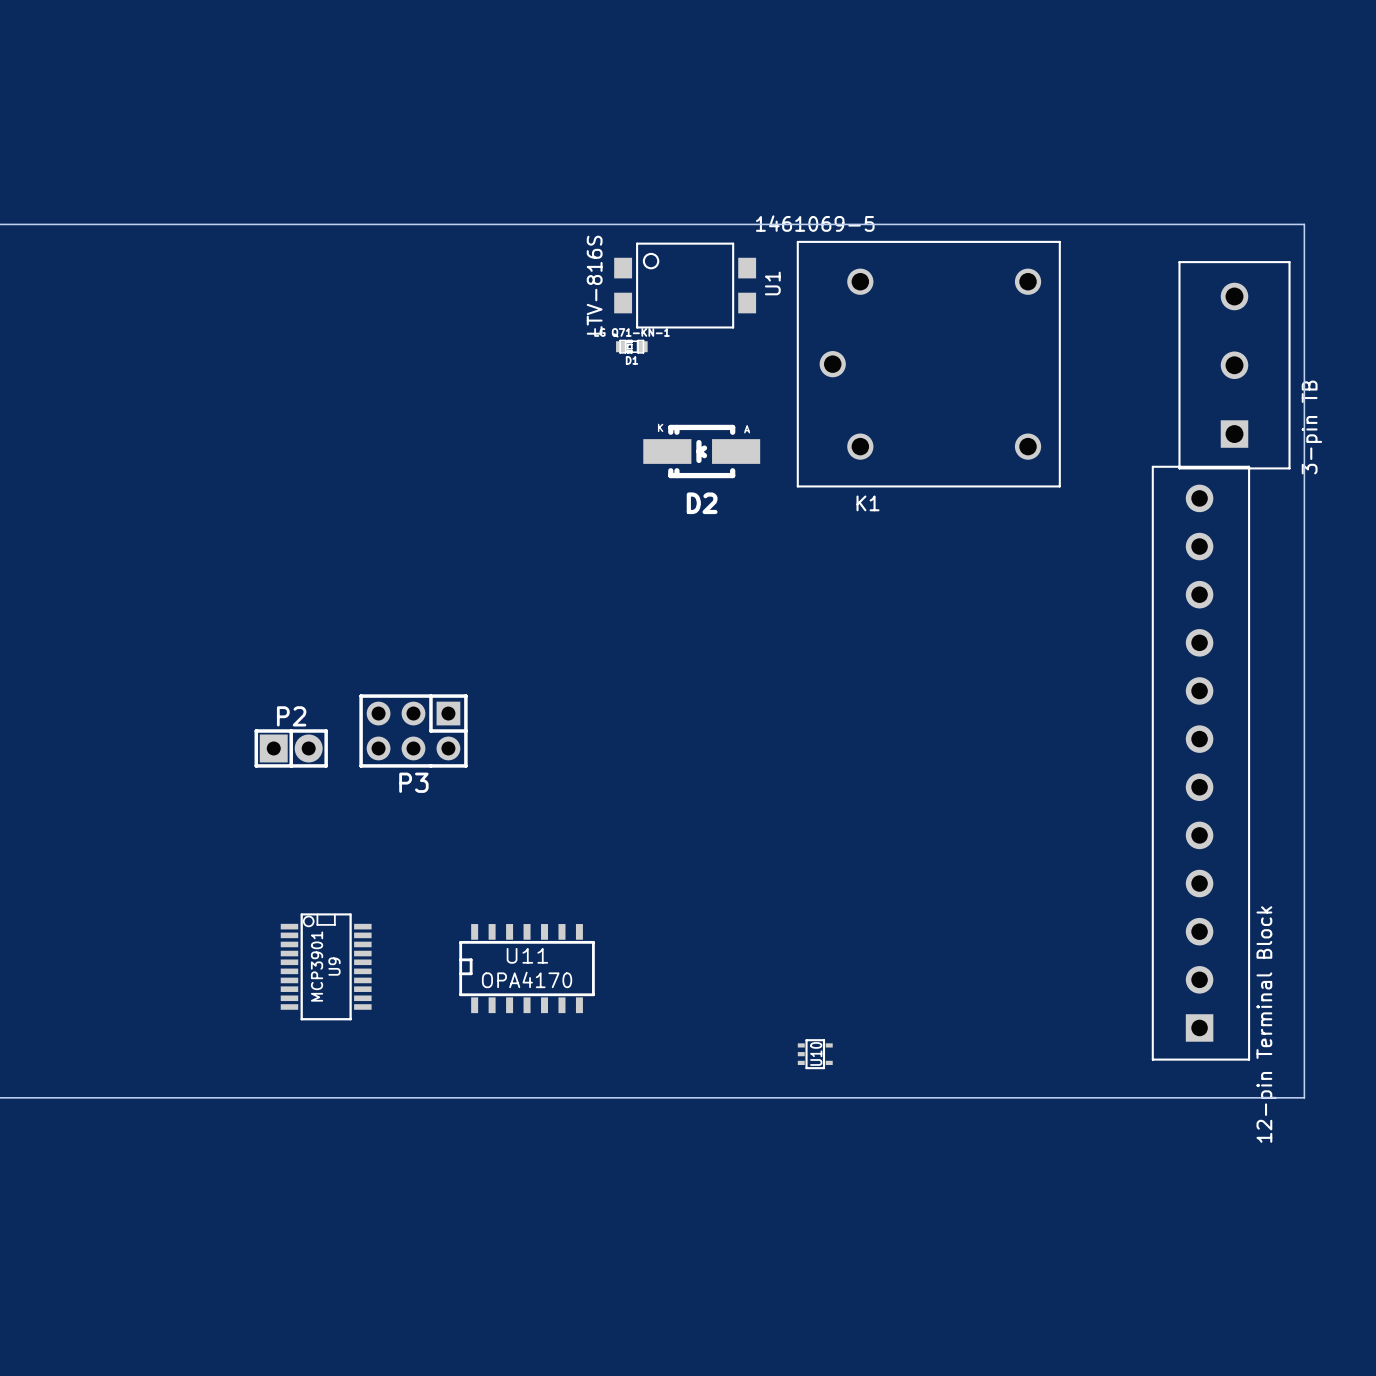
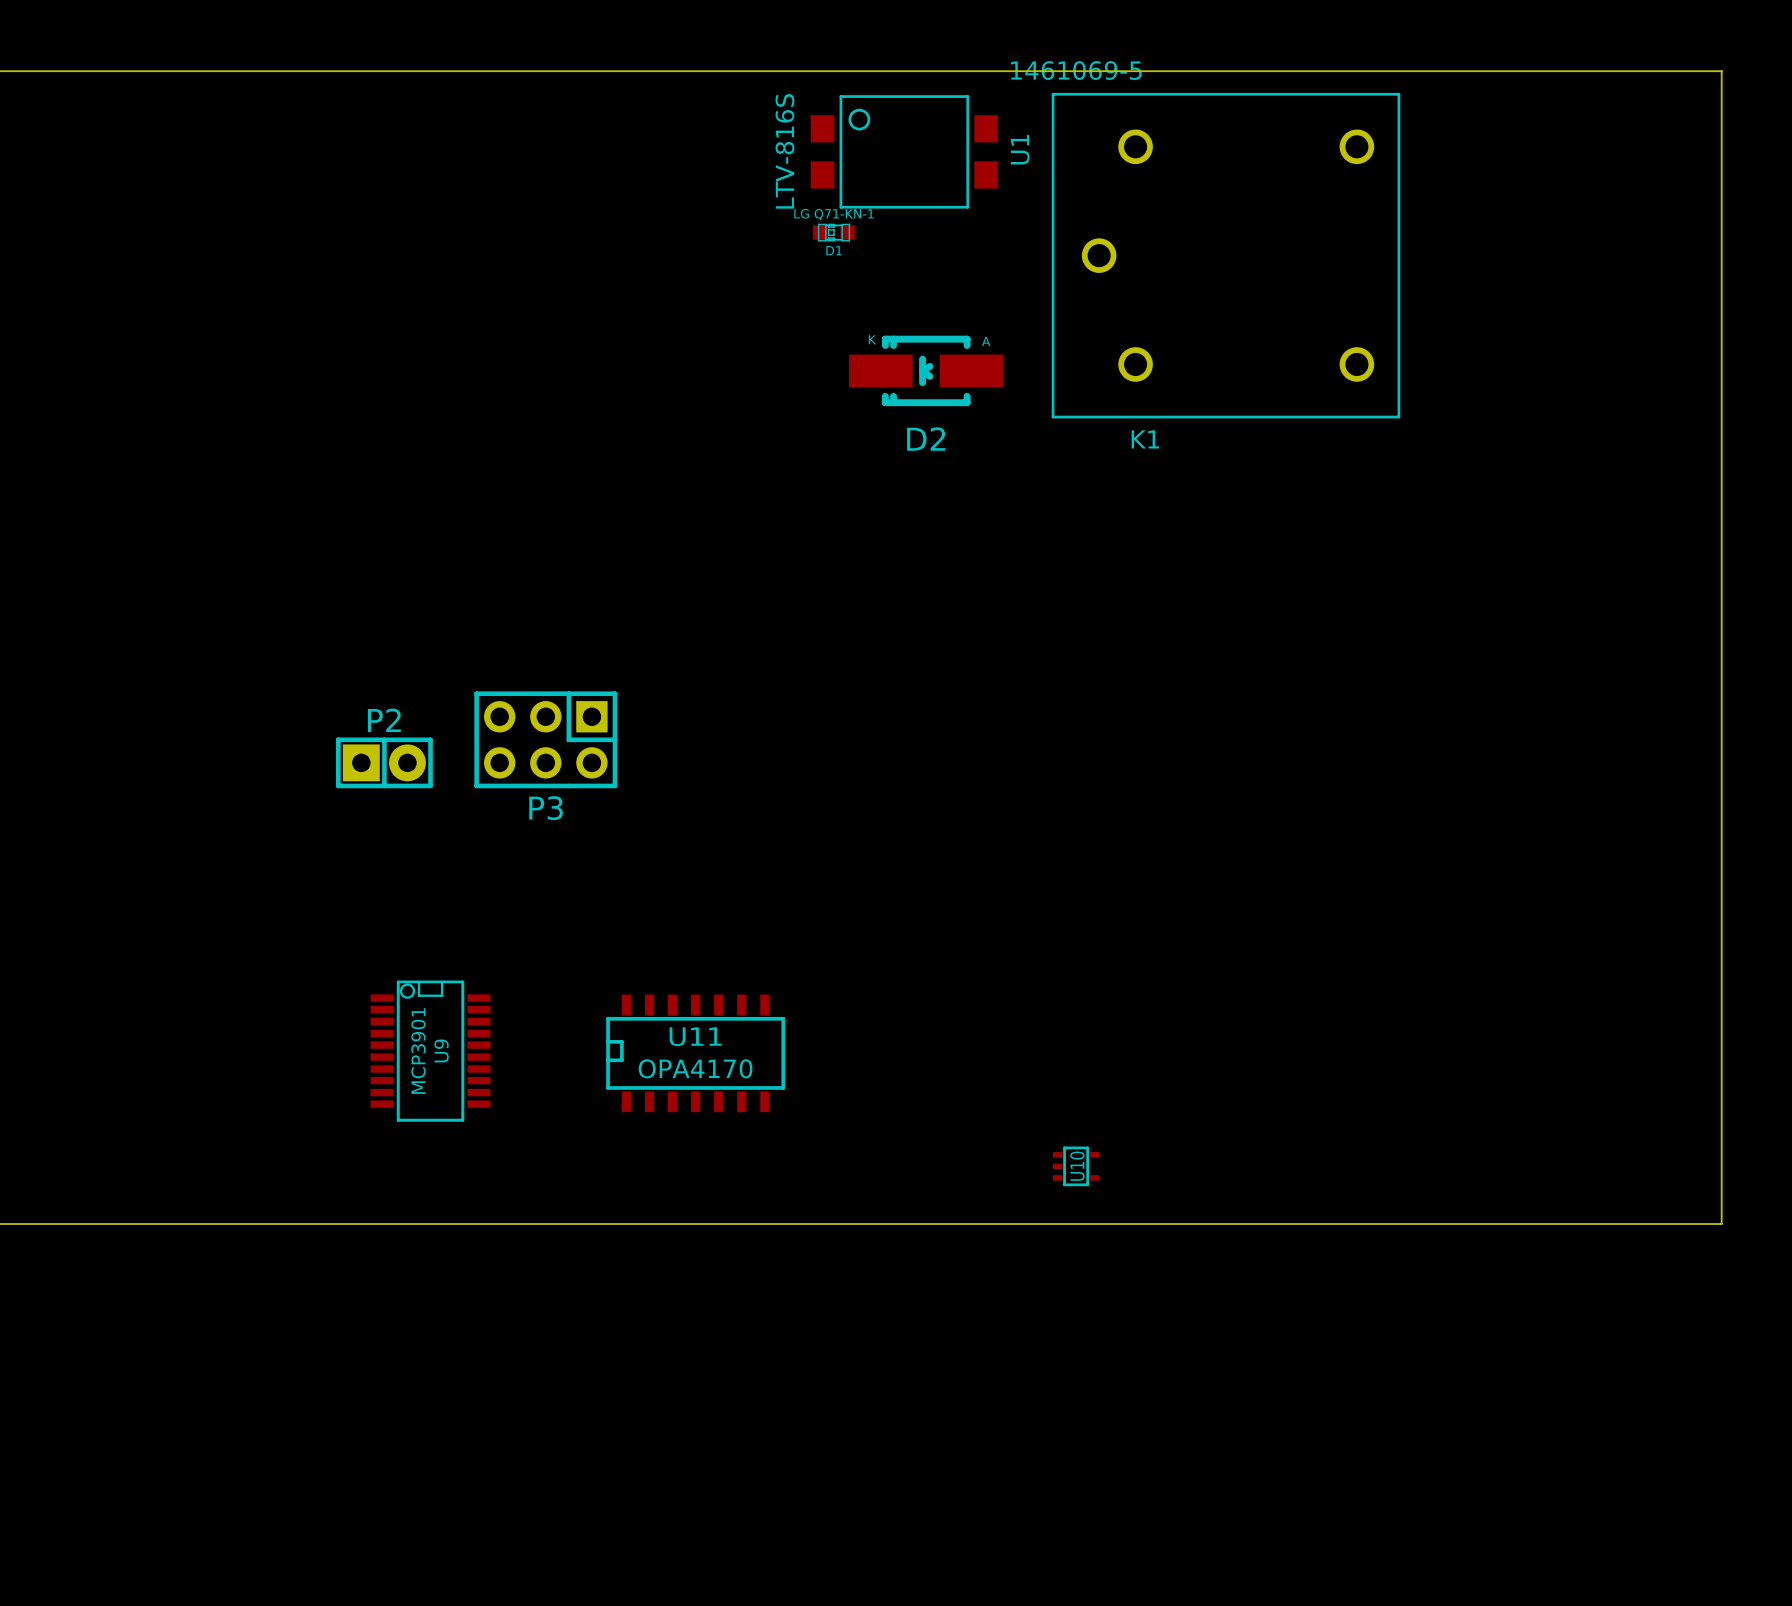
part: 3-pin TB (1234, 365) -> none
part: 12-pin Terminal Block (1200, 763) -> none

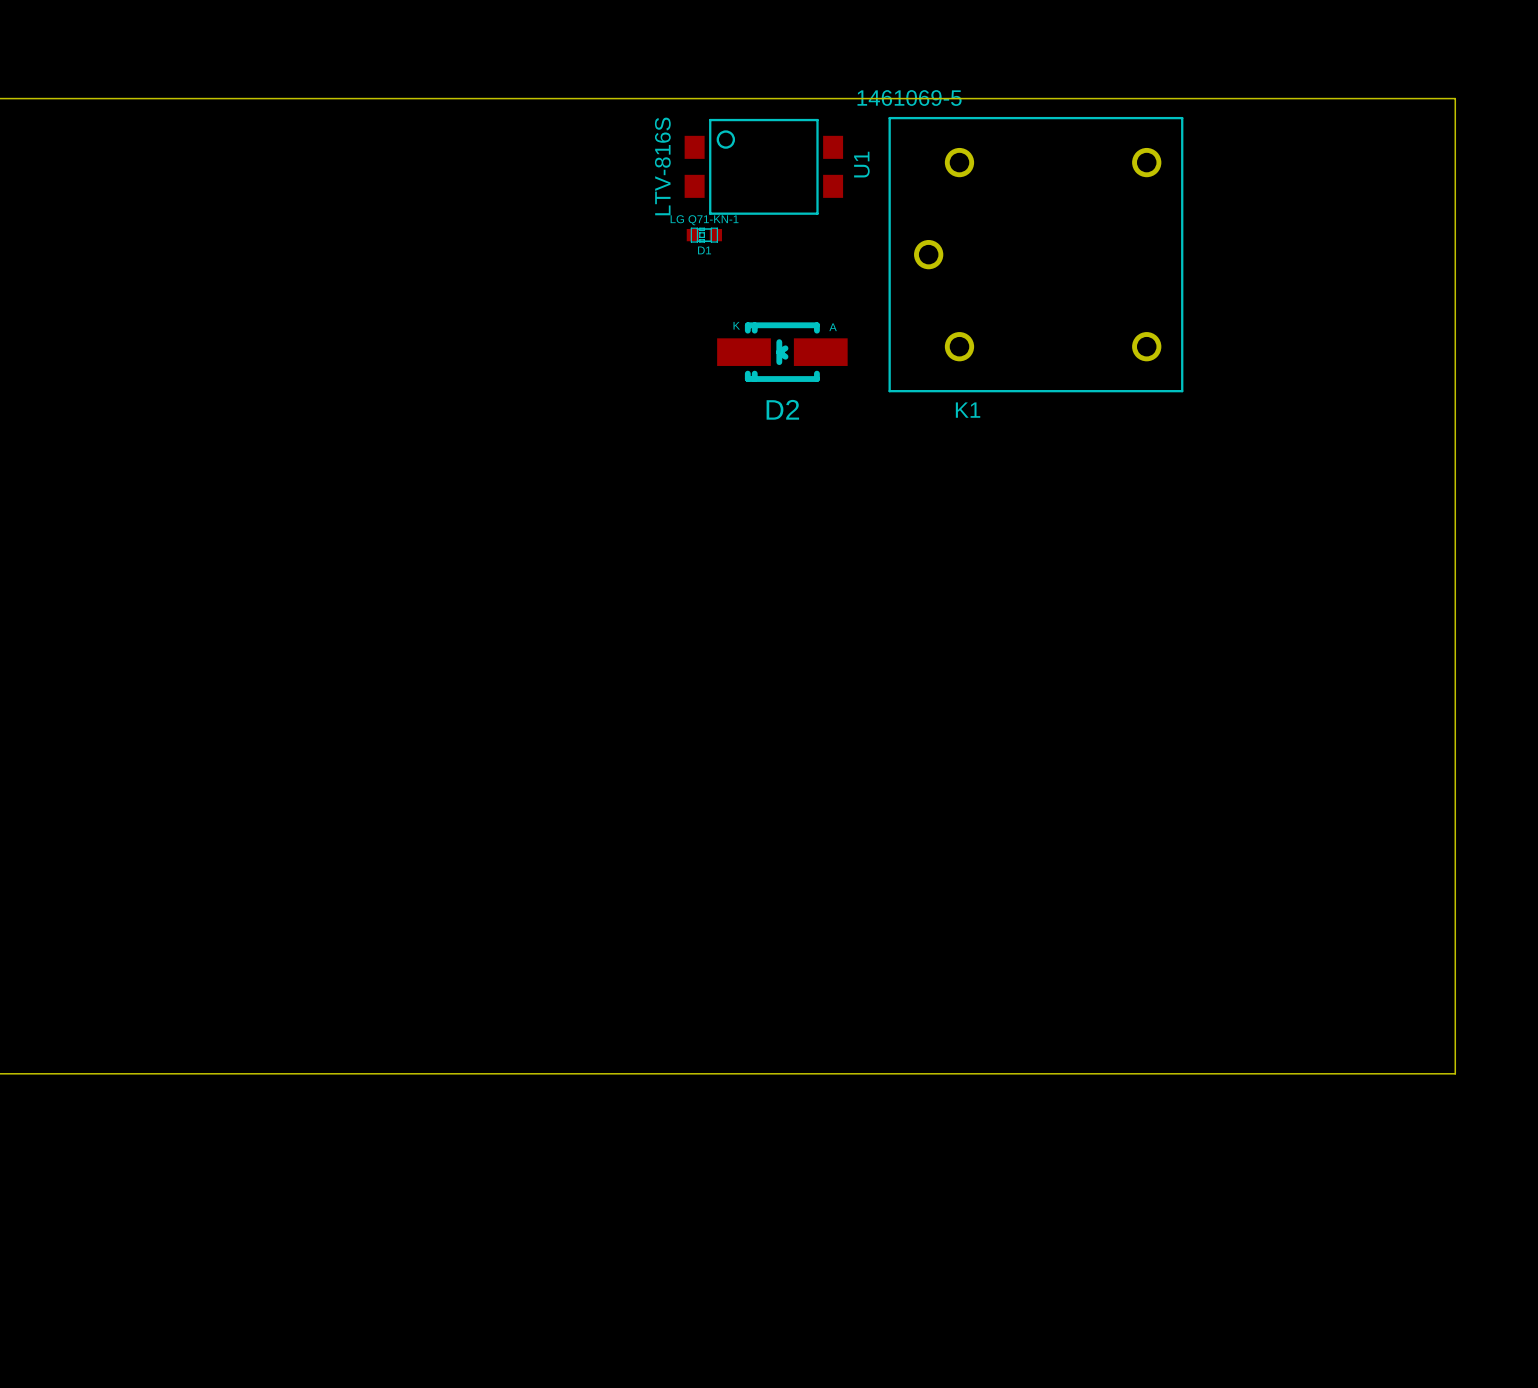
P3: (545, 739) -> none
P2: (384, 762) -> none
U9: MCP3901 (430, 1051) -> none
U11: OPA4170 (695, 1053) -> none
U10: (1076, 1166) -> none

